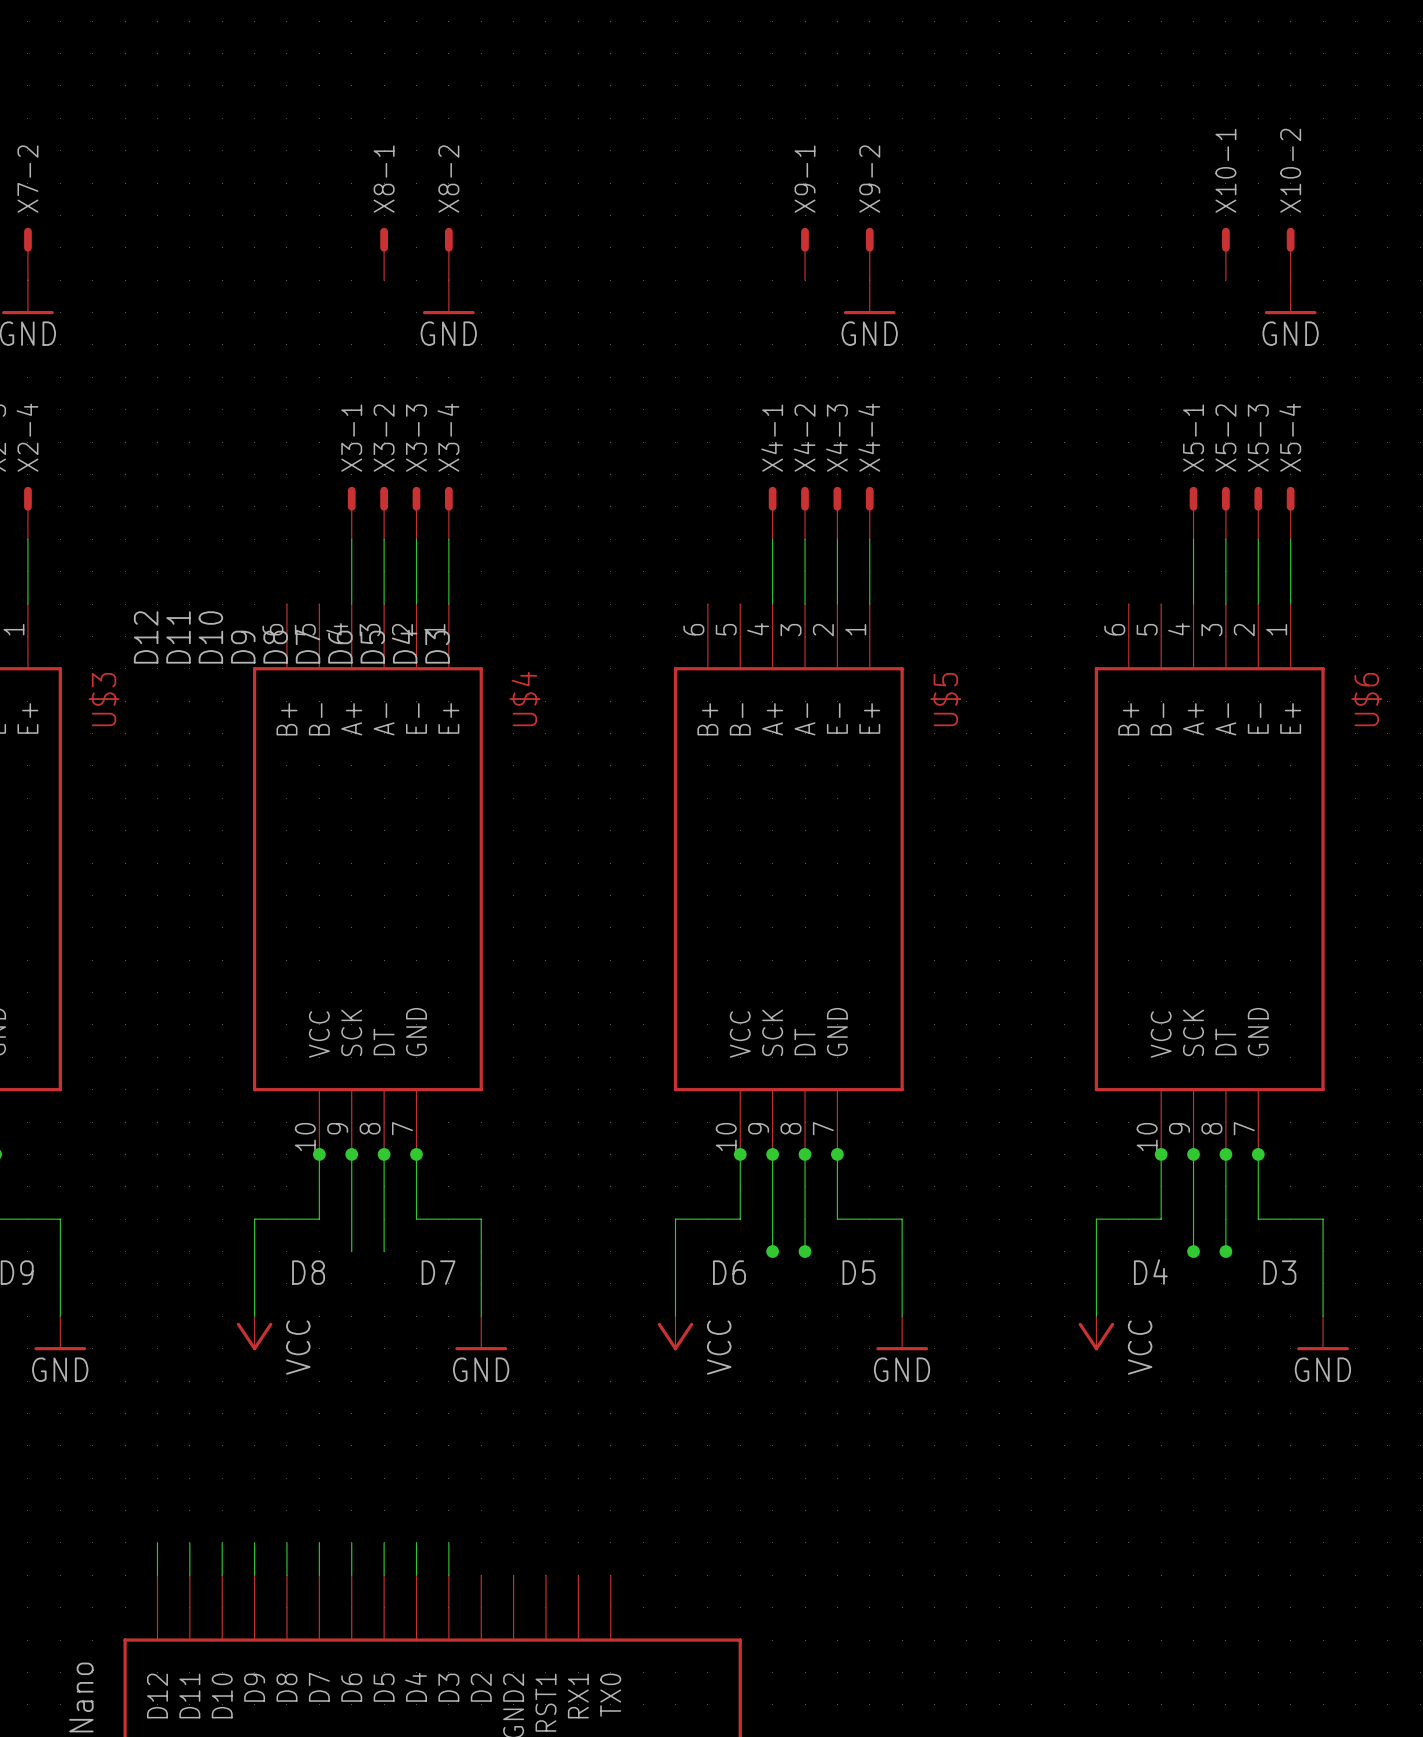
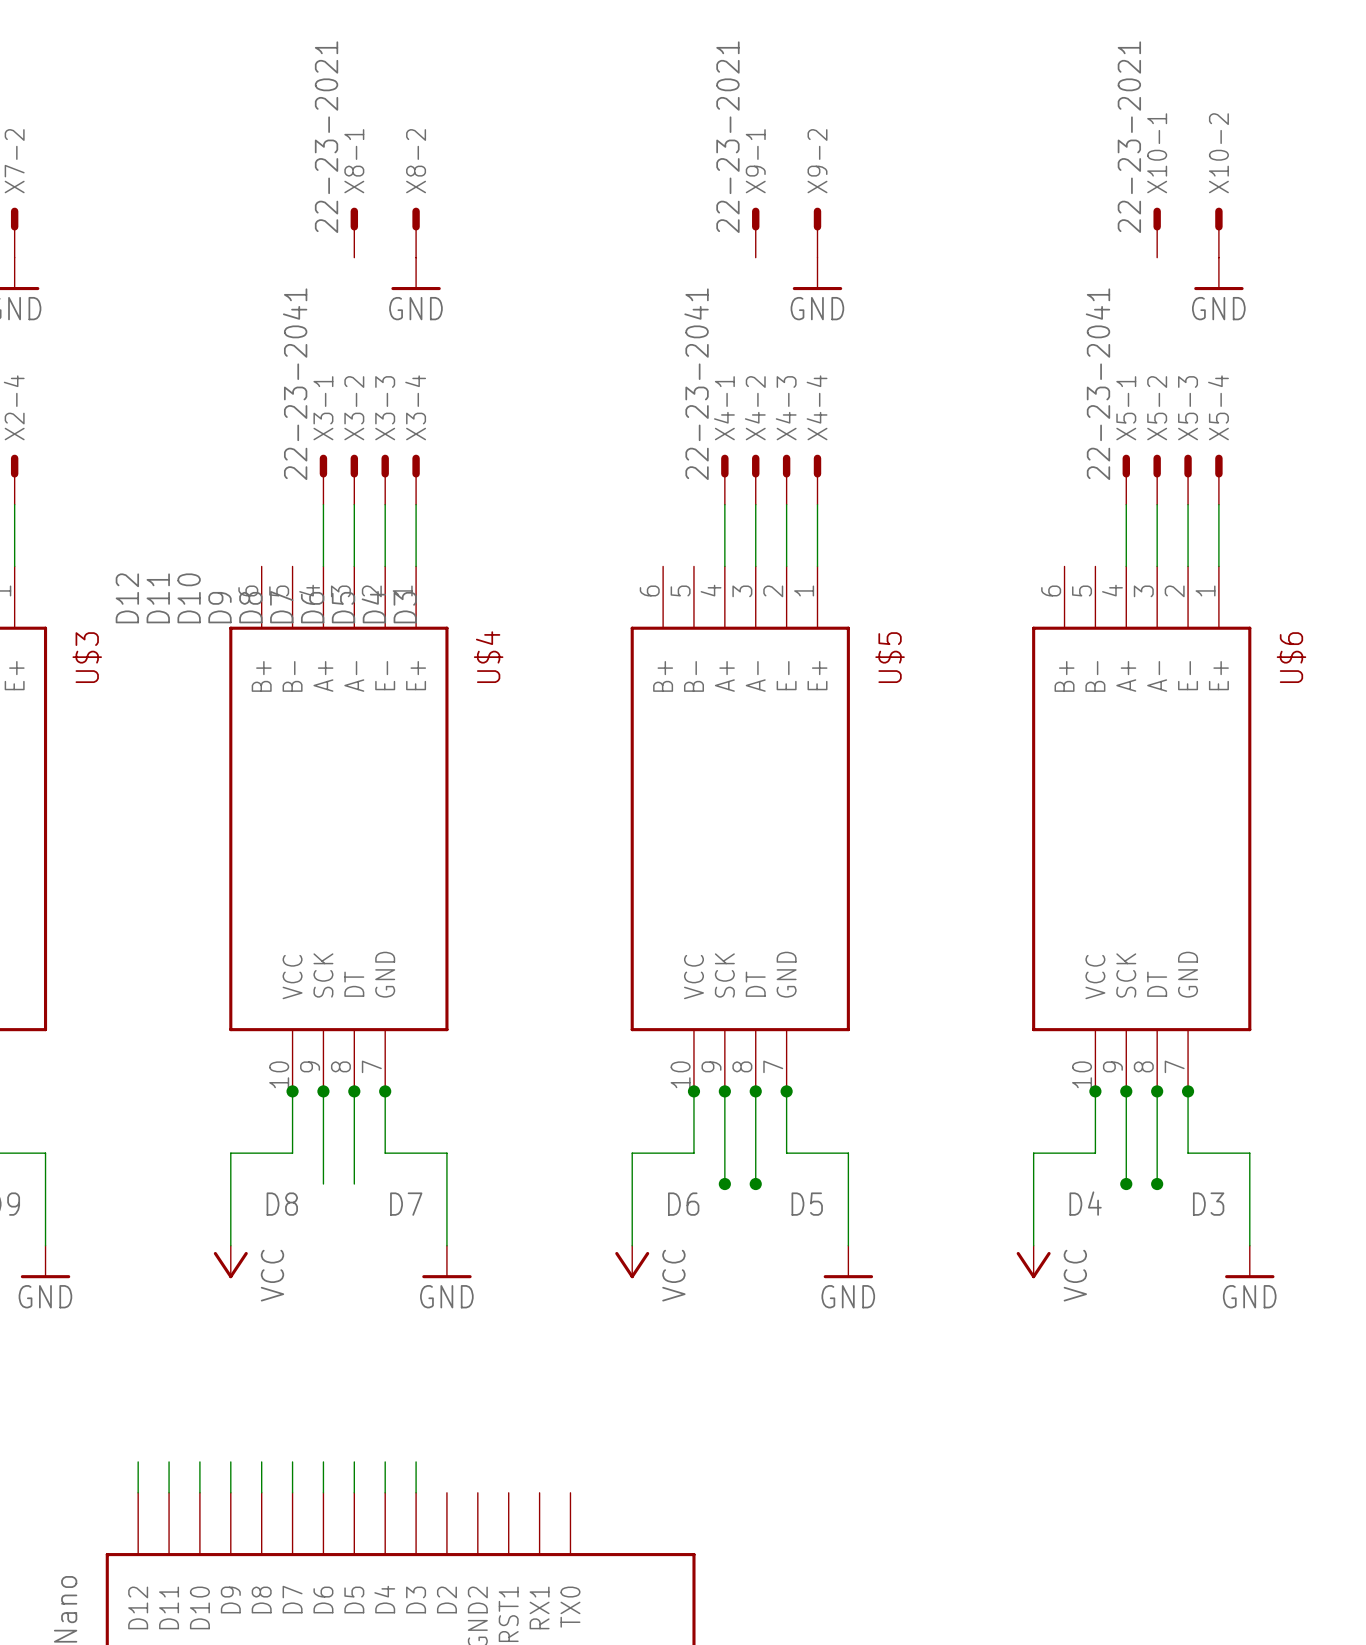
X8-1 value: none -> 22-23-2021 (326, 137)
X9-1 value: none -> 22-23-2021 (727, 137)
X10-1 value: none -> 22-23-2021 (1129, 137)
X3-1 value: none -> 22-23-2041 (295, 384)
X4-1 value: none -> 22-23-2041 (696, 384)
X5-1 value: none -> 22-23-2041 (1097, 384)

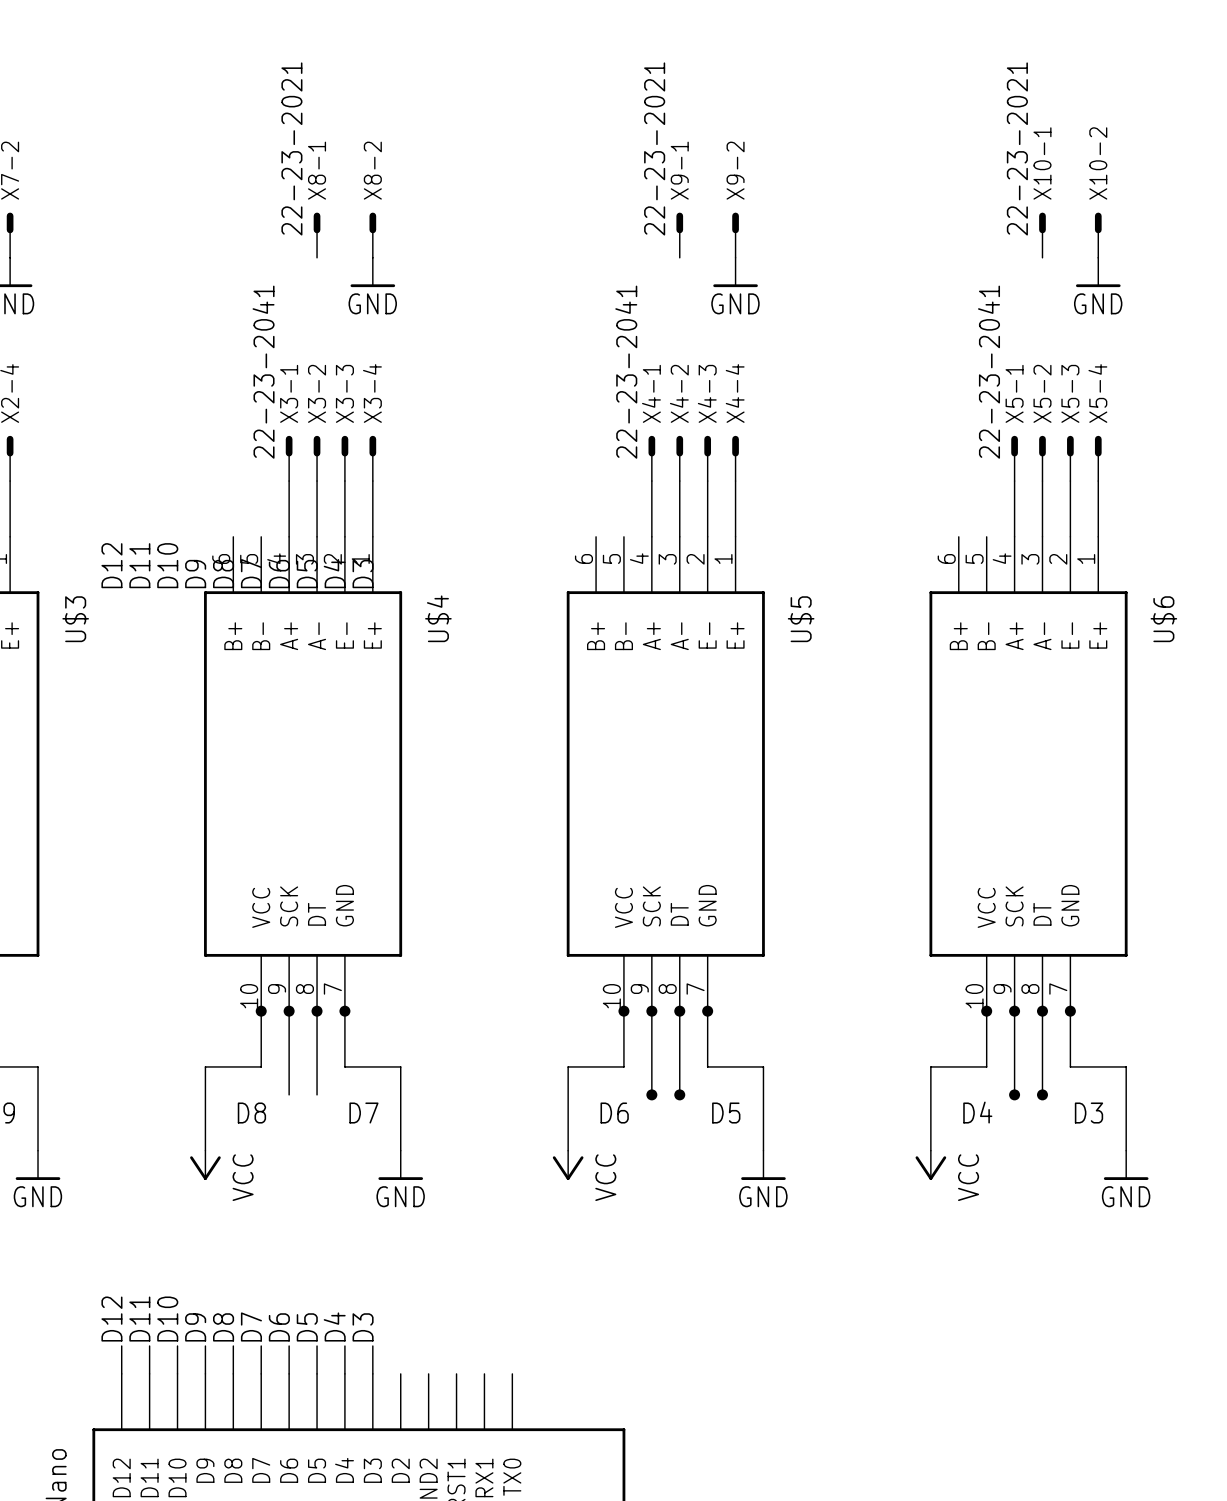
label: none -> D12 (111, 1319)
label: none -> D11 (139, 1319)
label: none -> D10 (167, 1319)
label: none -> D7 (251, 1326)
label: none -> D4 (334, 1326)
label: none -> D9 (195, 1327)
label: none -> D8 (223, 1327)
label: none -> D6 (279, 1327)
label: none -> D5 (307, 1327)
label: none -> D3 (363, 1327)

